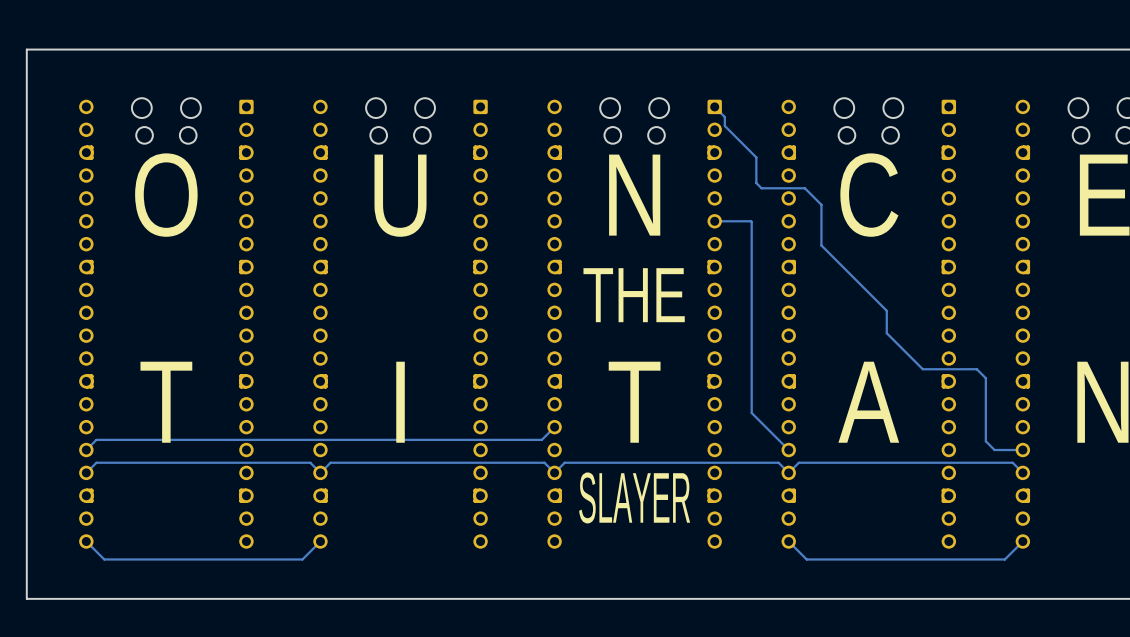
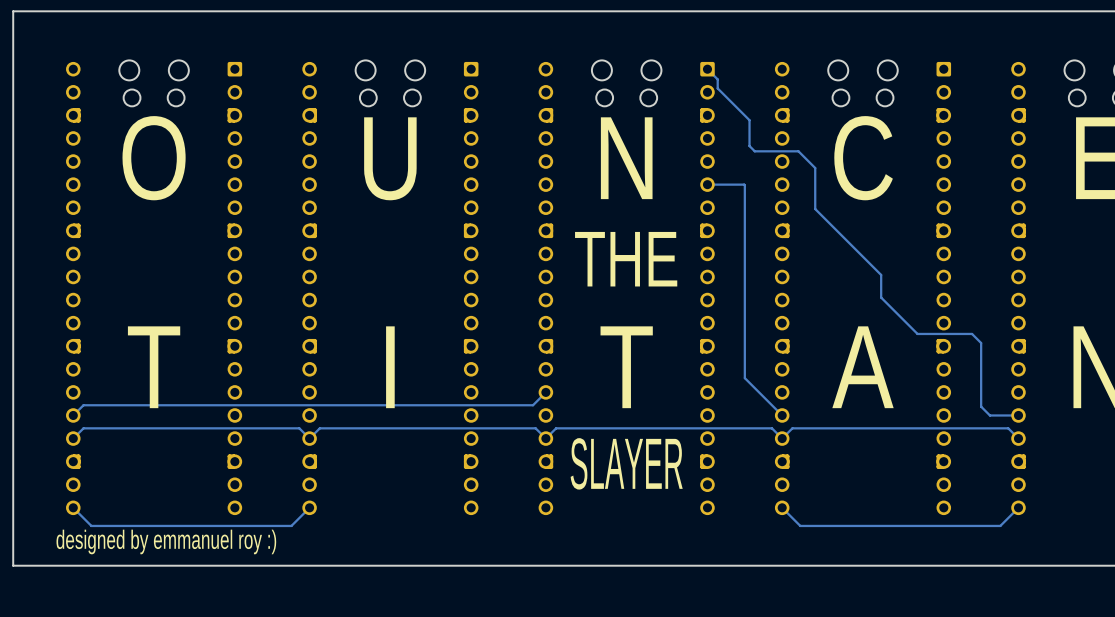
text: none -> designed by emmanuel roy :) (166, 541)

